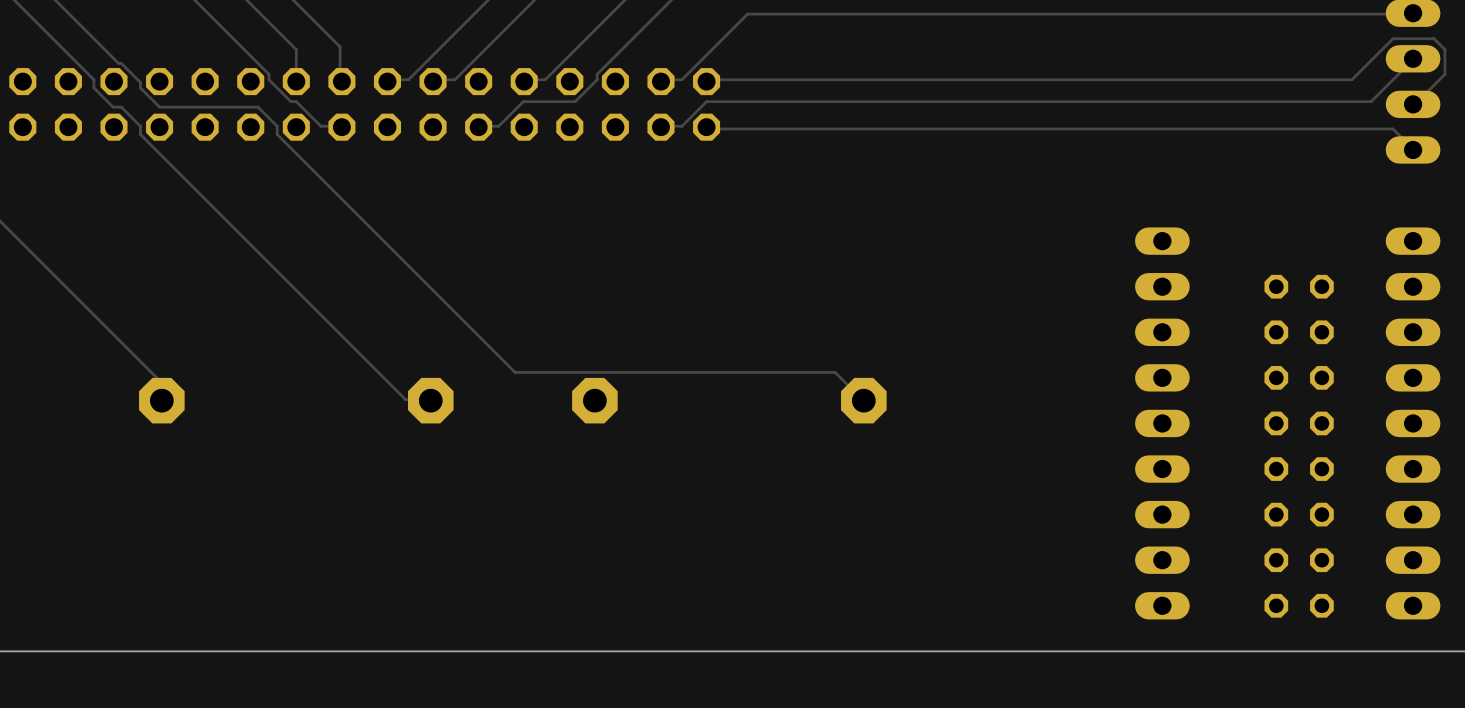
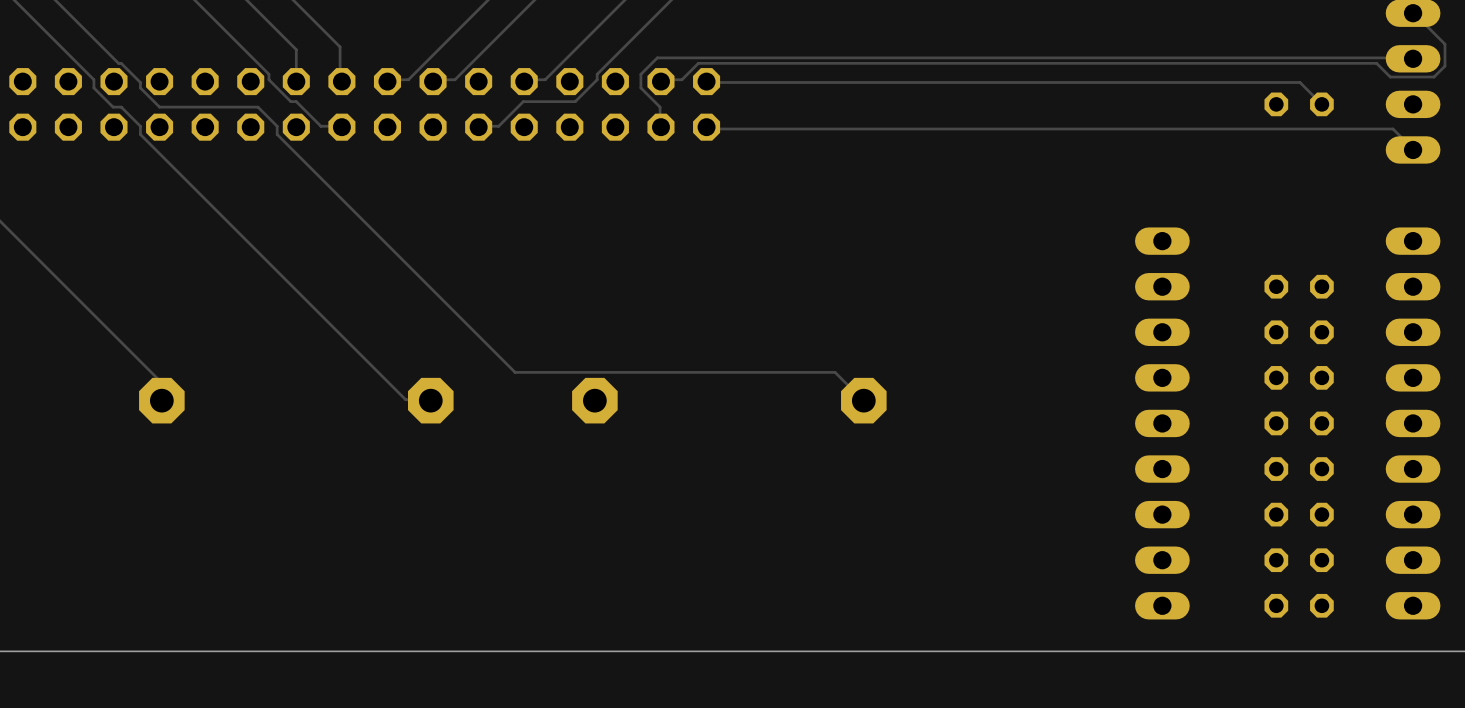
track: (1413, 13) (747, 14) (698, 63) -> (1444, 66) (1434, 77) (1390, 77) (1376, 63) (698, 63)
track: none -> (1413, 13) (1444, 44) (1444, 49)
track: (1444, 49) (1434, 38) (1393, 38) (1352, 79) (706, 79) (706, 81) -> (1321, 104) (1300, 82) (706, 81)
track: (1413, 58) (1371, 101) (706, 101) (681, 126) (660, 127) -> (1413, 58) (657, 57) (640, 74) (640, 87) (660, 107) (660, 127)
track: (1444, 66) (1444, 74) (1413, 104) -> none
part: none -> (1299, 104)

